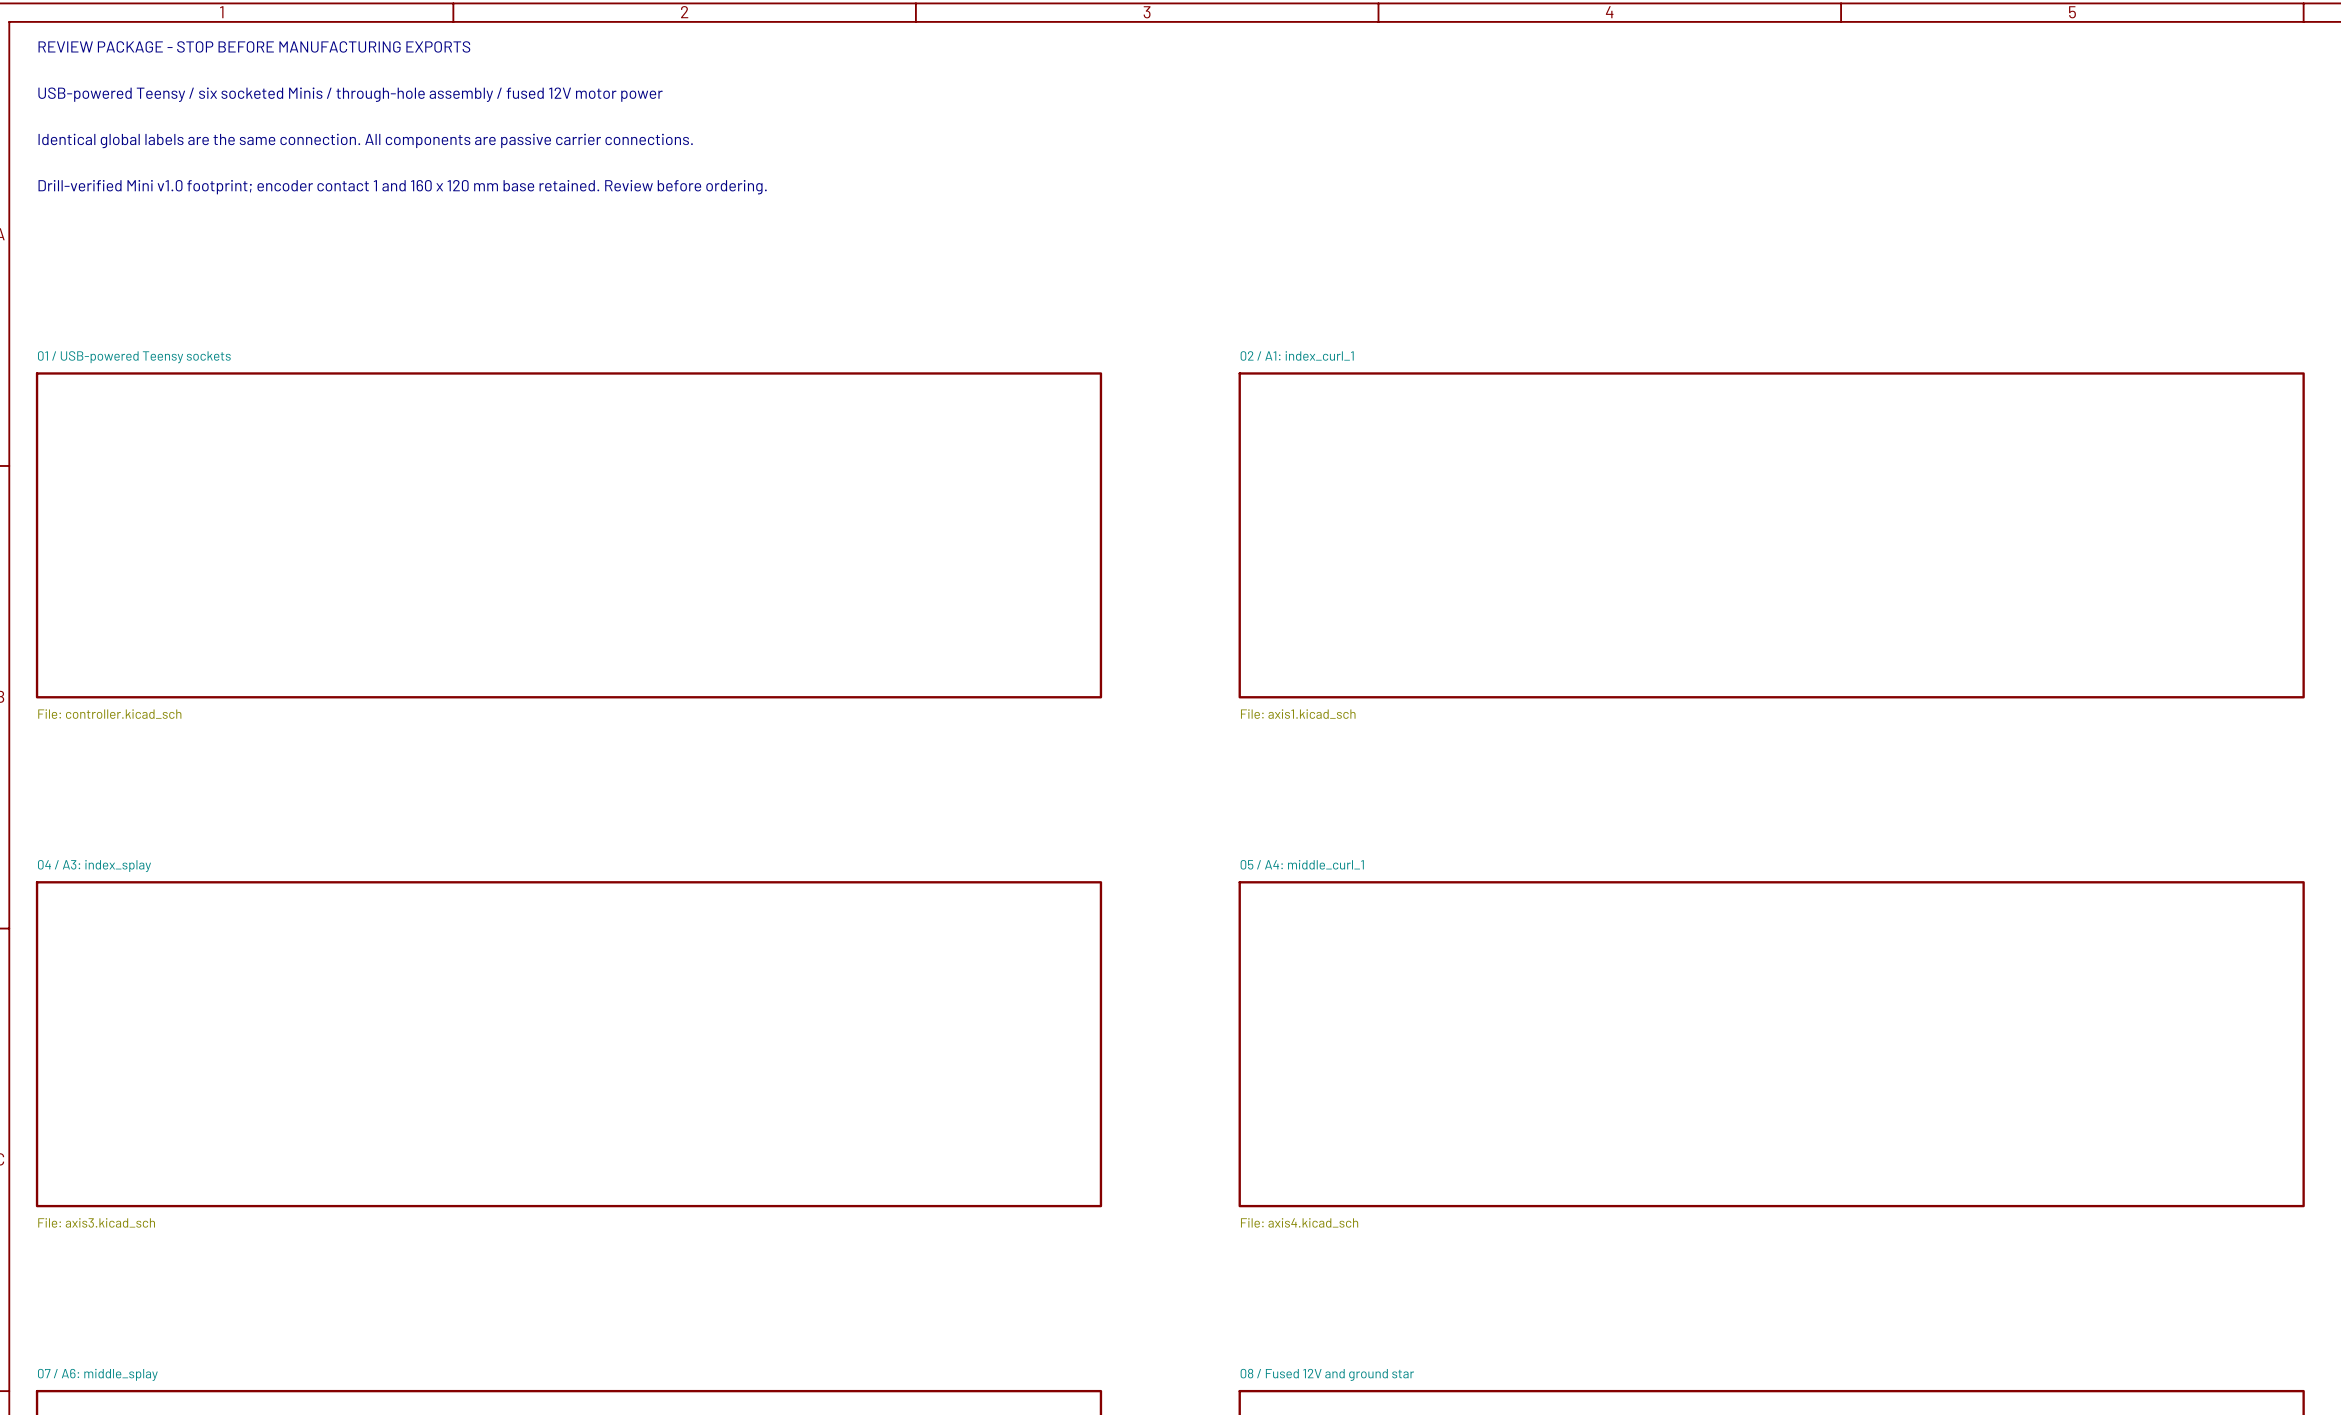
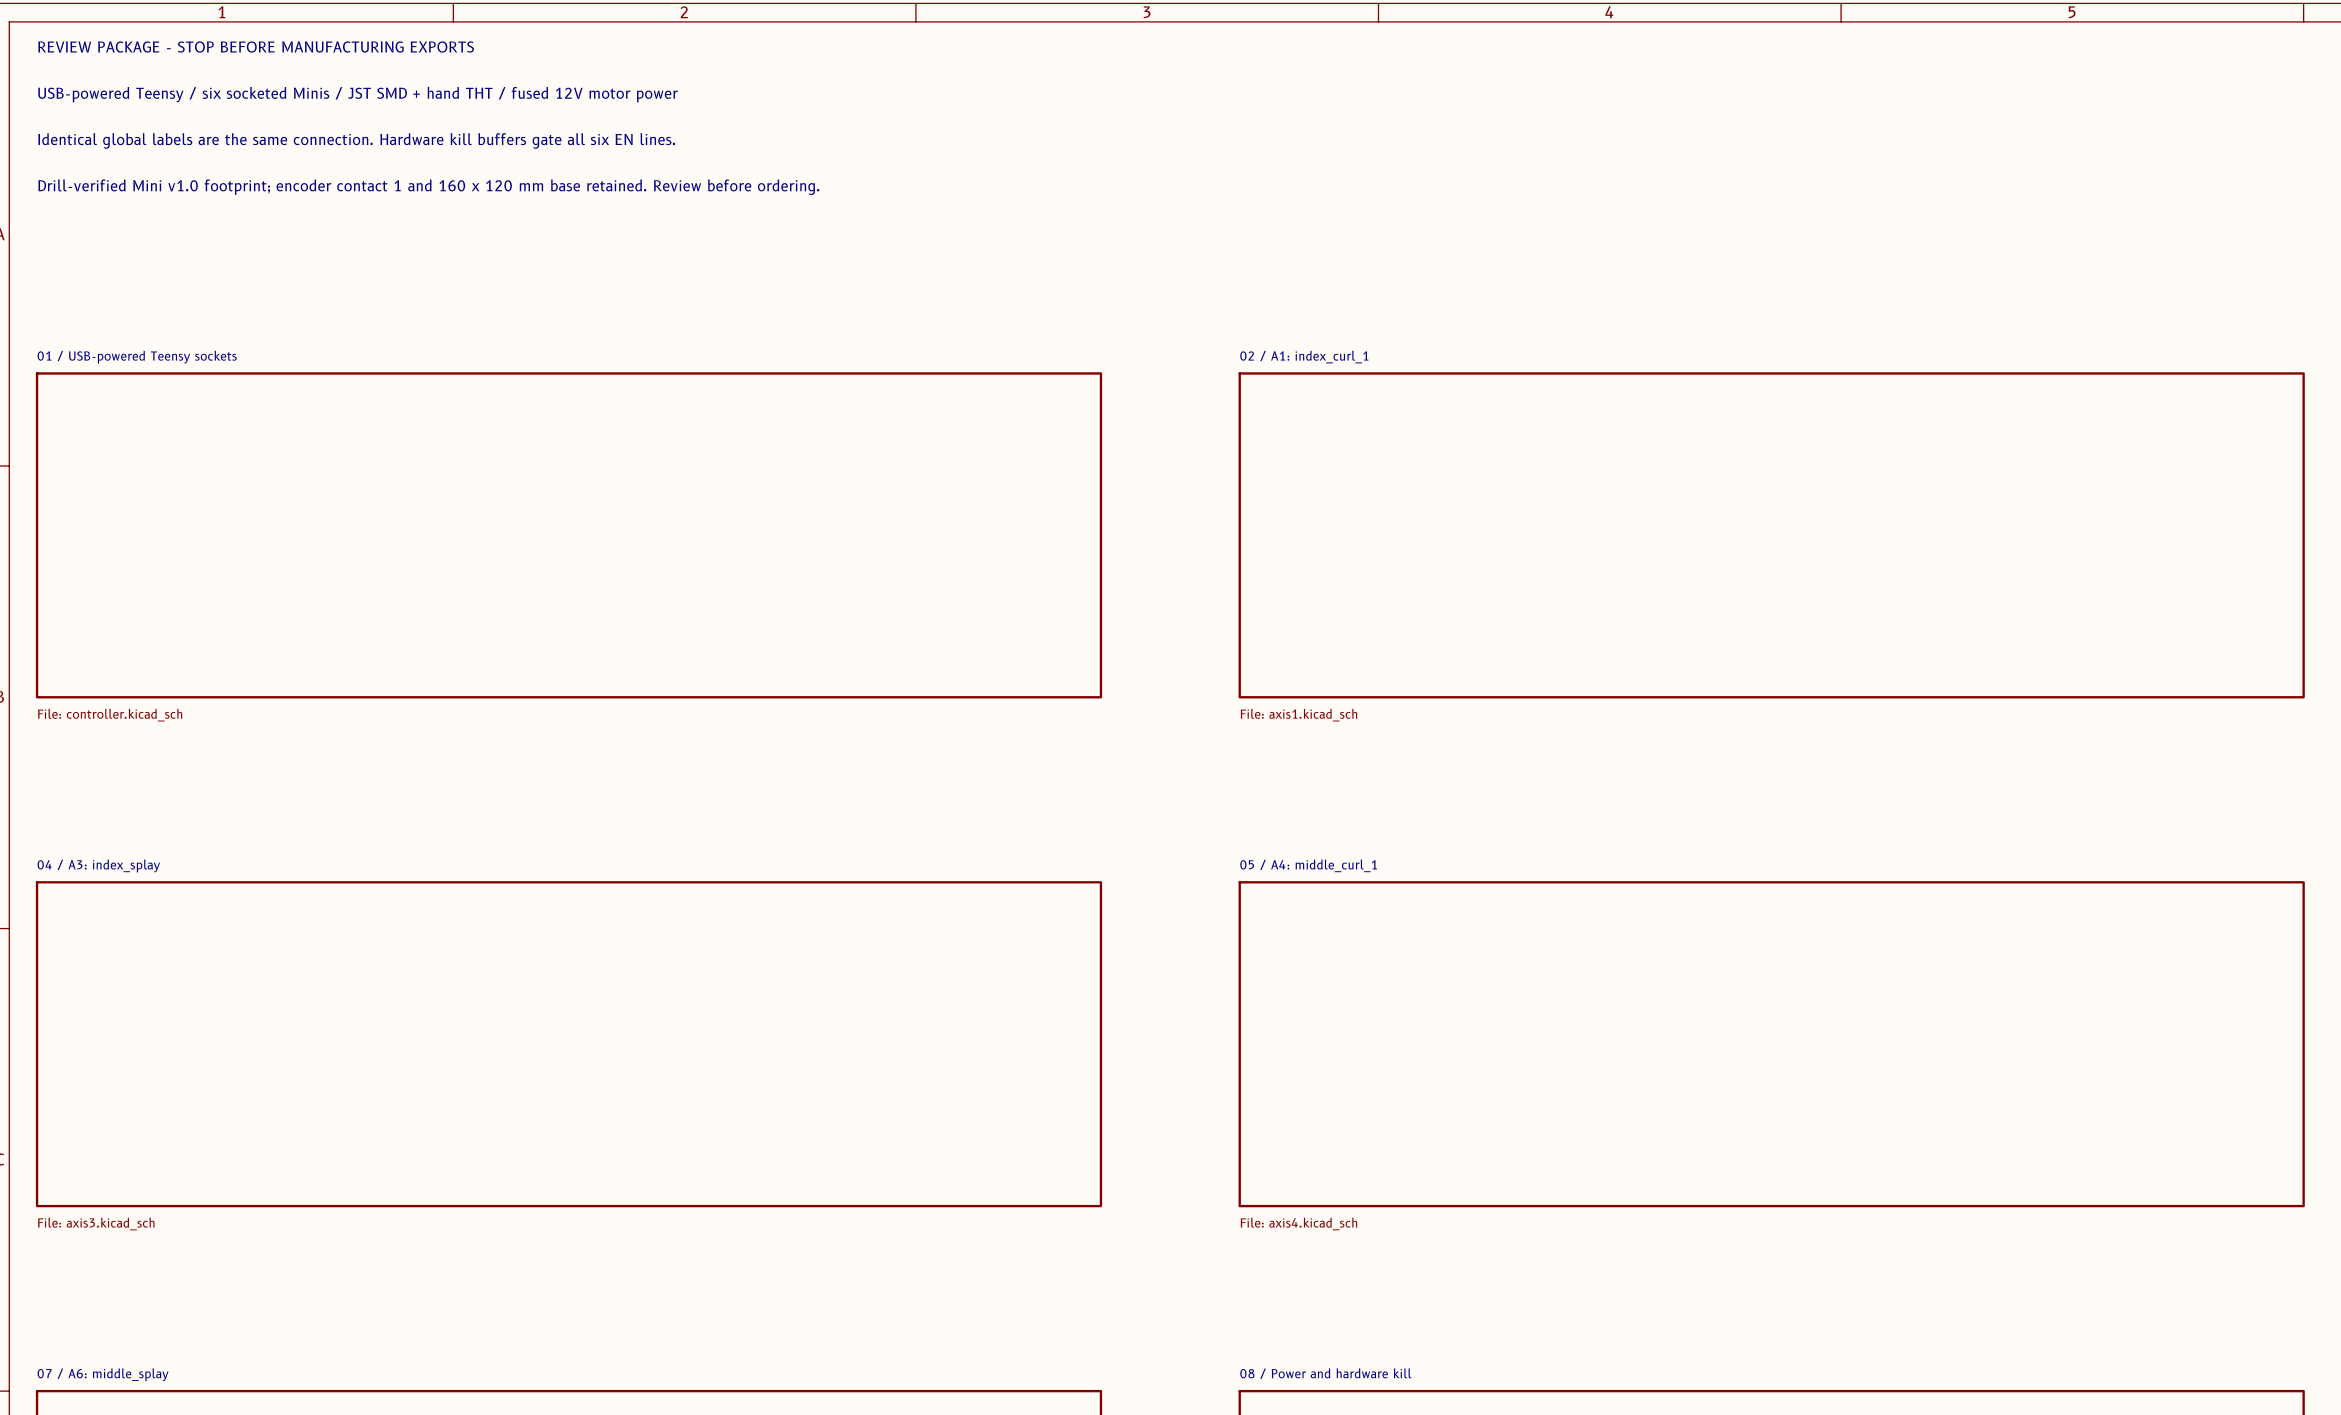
text: USB-powered Teensy / six socketed Minis / through-hole assembly / fused 12V motor power (350, 94) -> USB-powered Teensy / six socketed Minis / JST SMD + hand THT / fused 12V motor power (358, 94)
text: Identical global labels are the same connection. All components are passive carrier connections. (365, 140) -> Identical global labels are the same connection. Hardware kill buffers gate all six EN lines. (356, 140)
sheet 08 / Fused 12V and ground star name: 08 / Fused 12V and ground star (1327, 1374) -> 08 / Power and hardware kill (1325, 1373)

